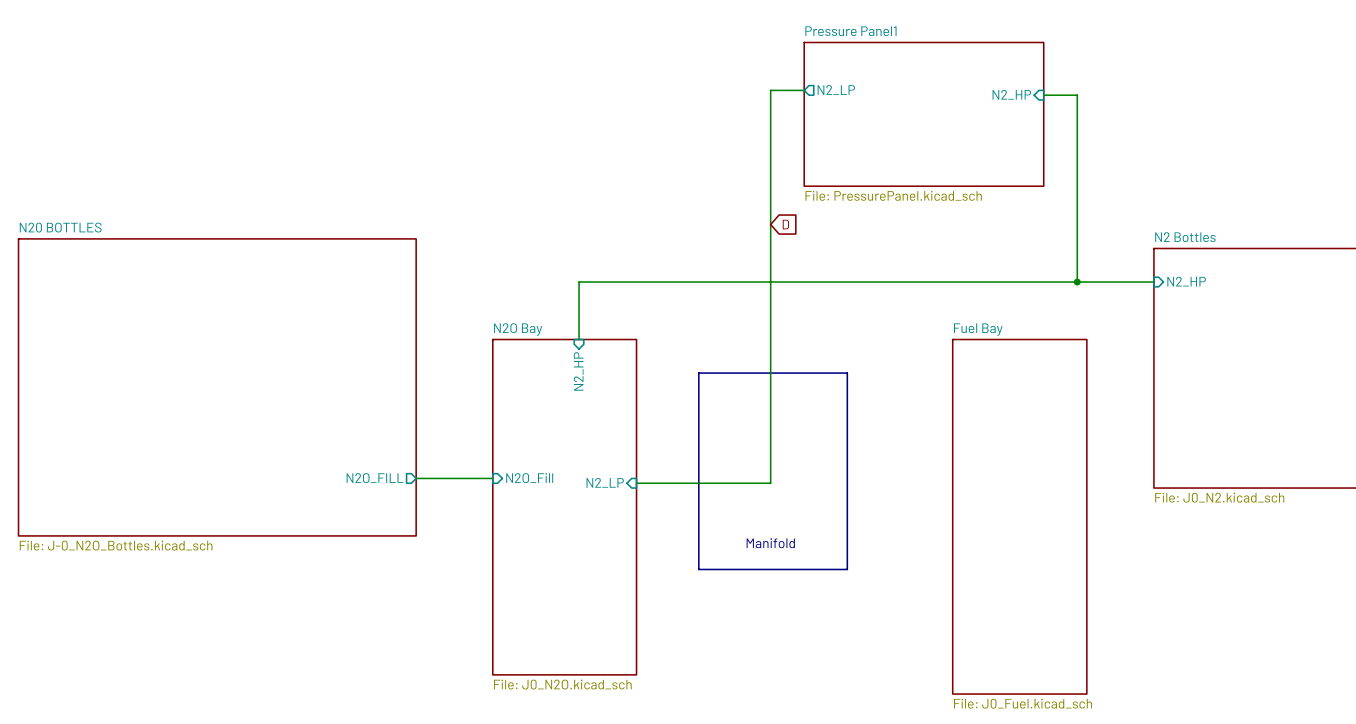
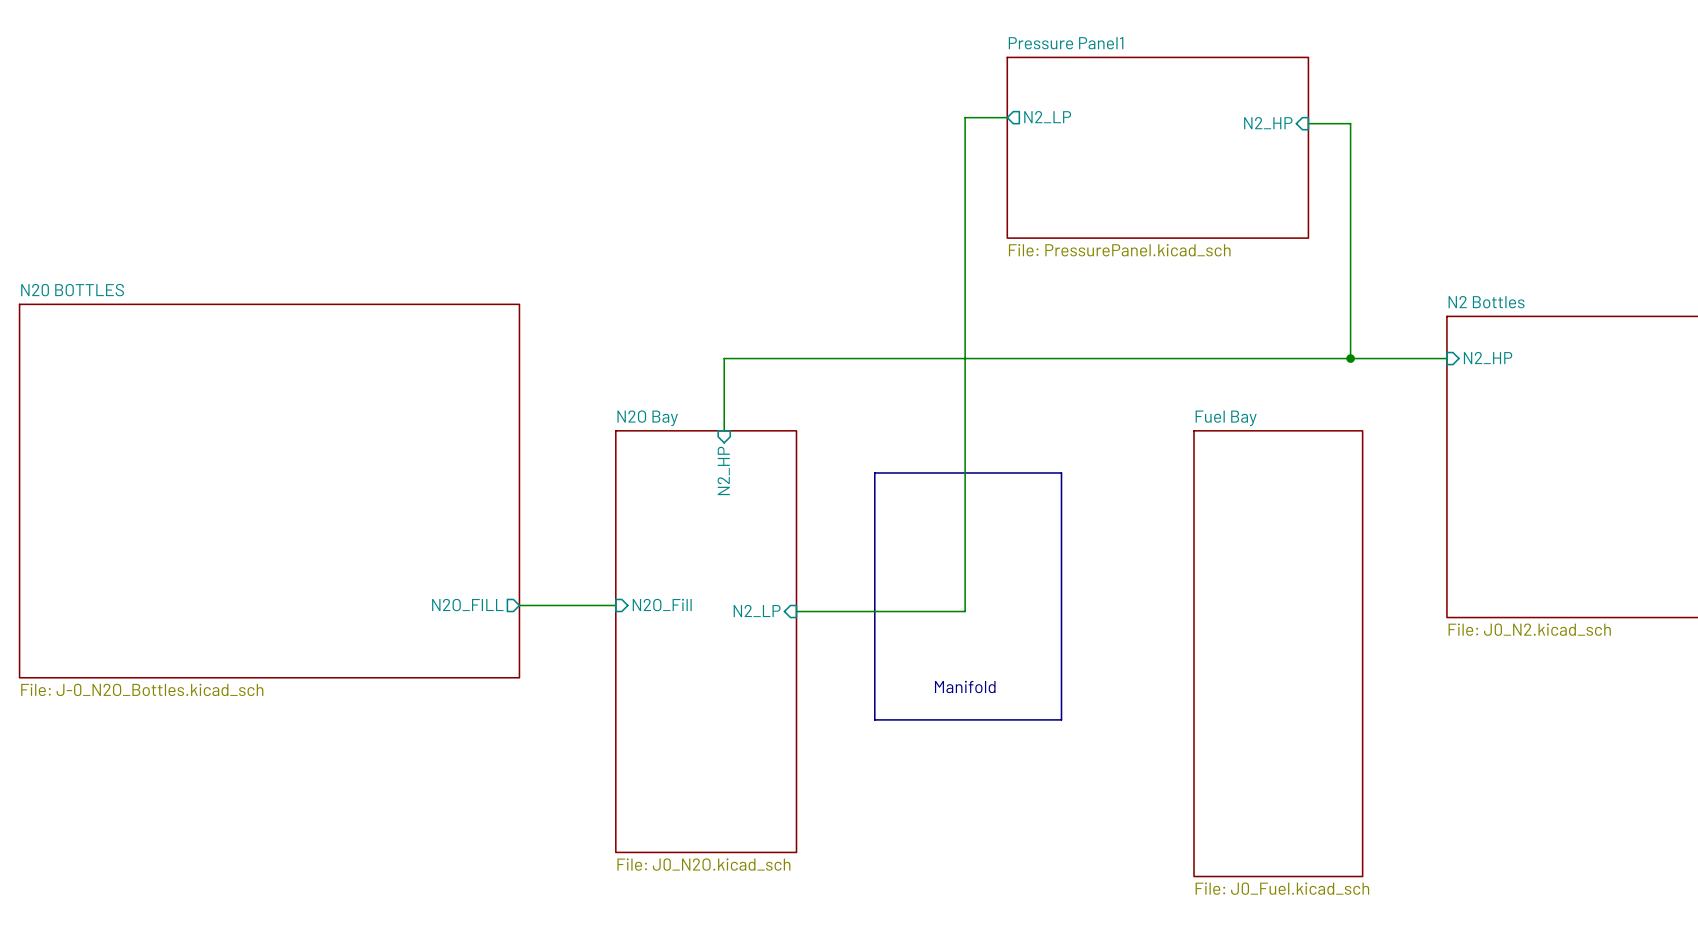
global label: D (785, 224) -> none

